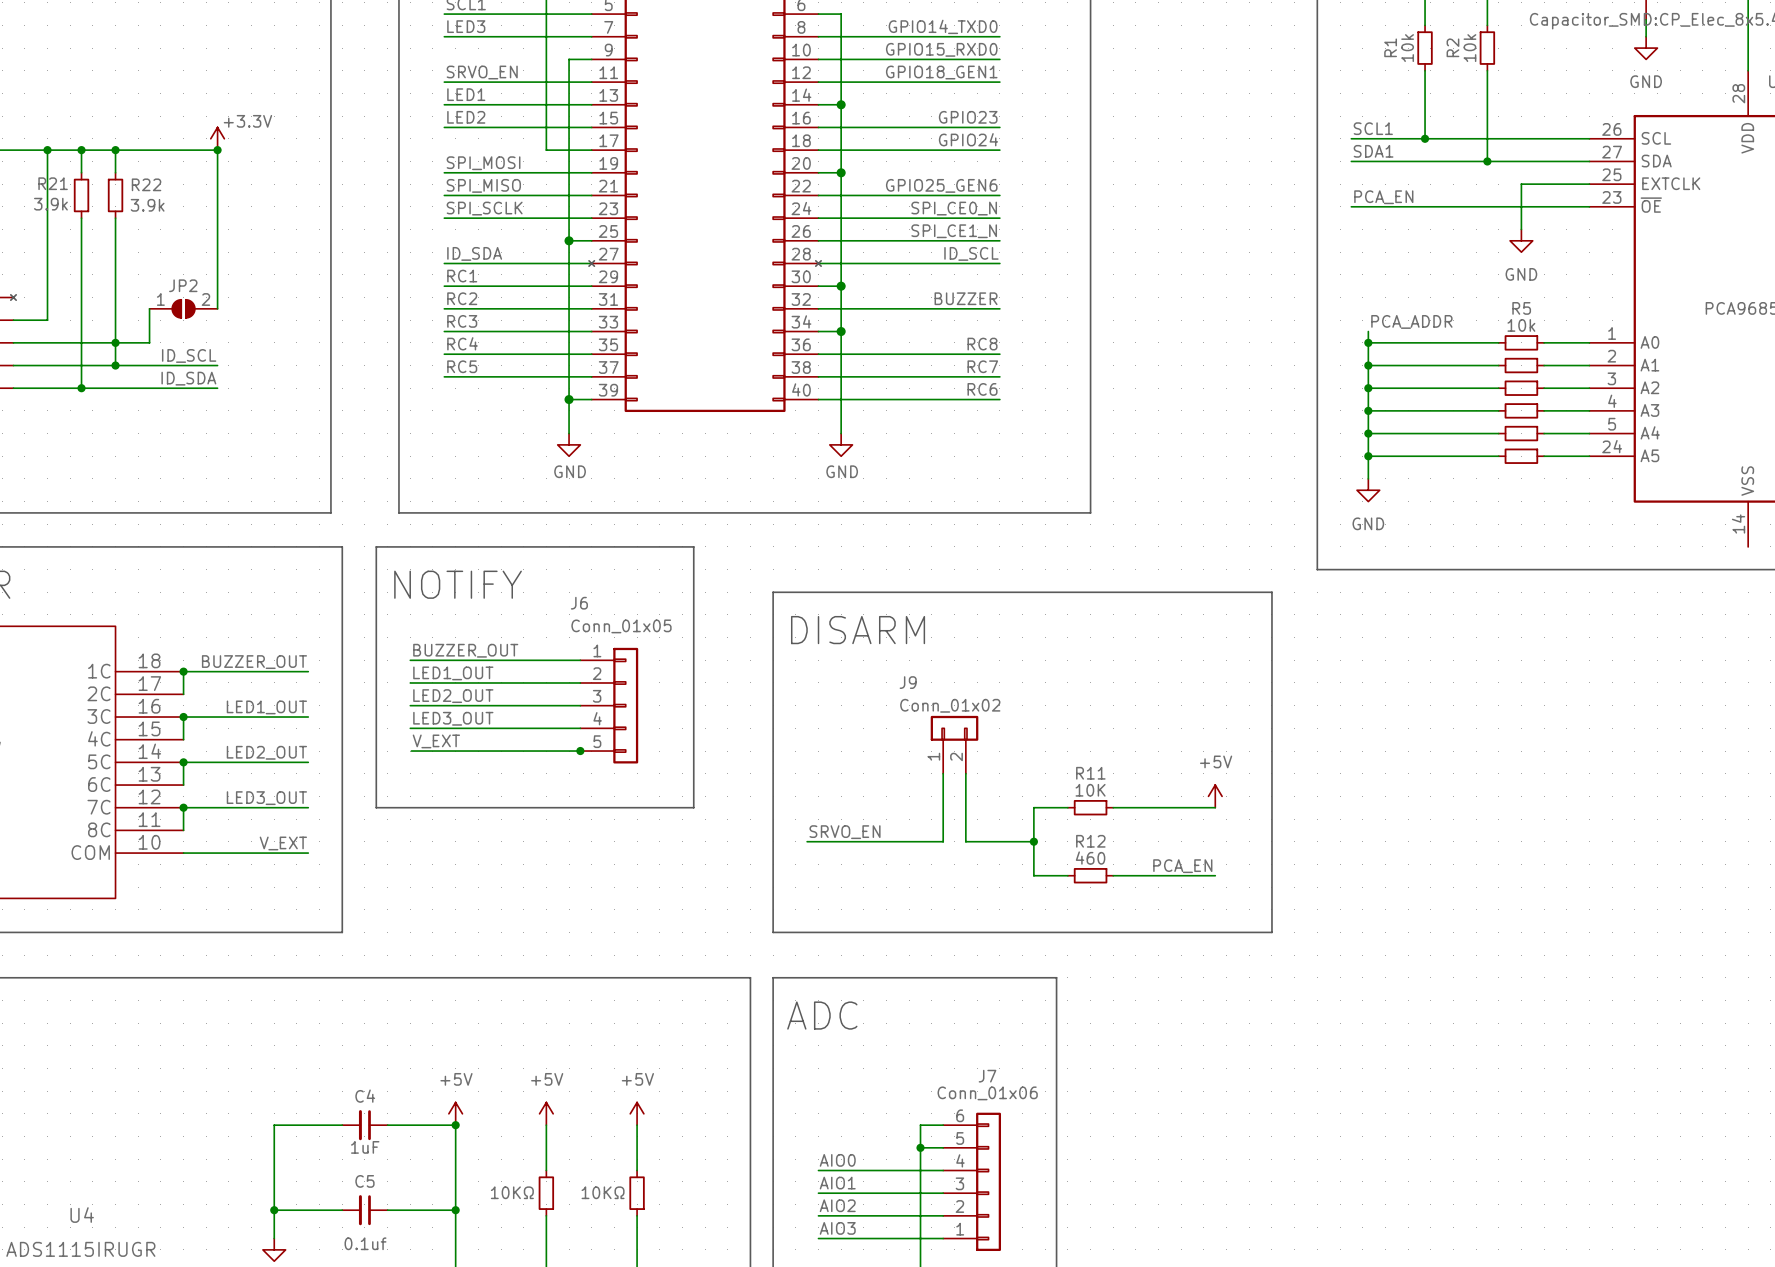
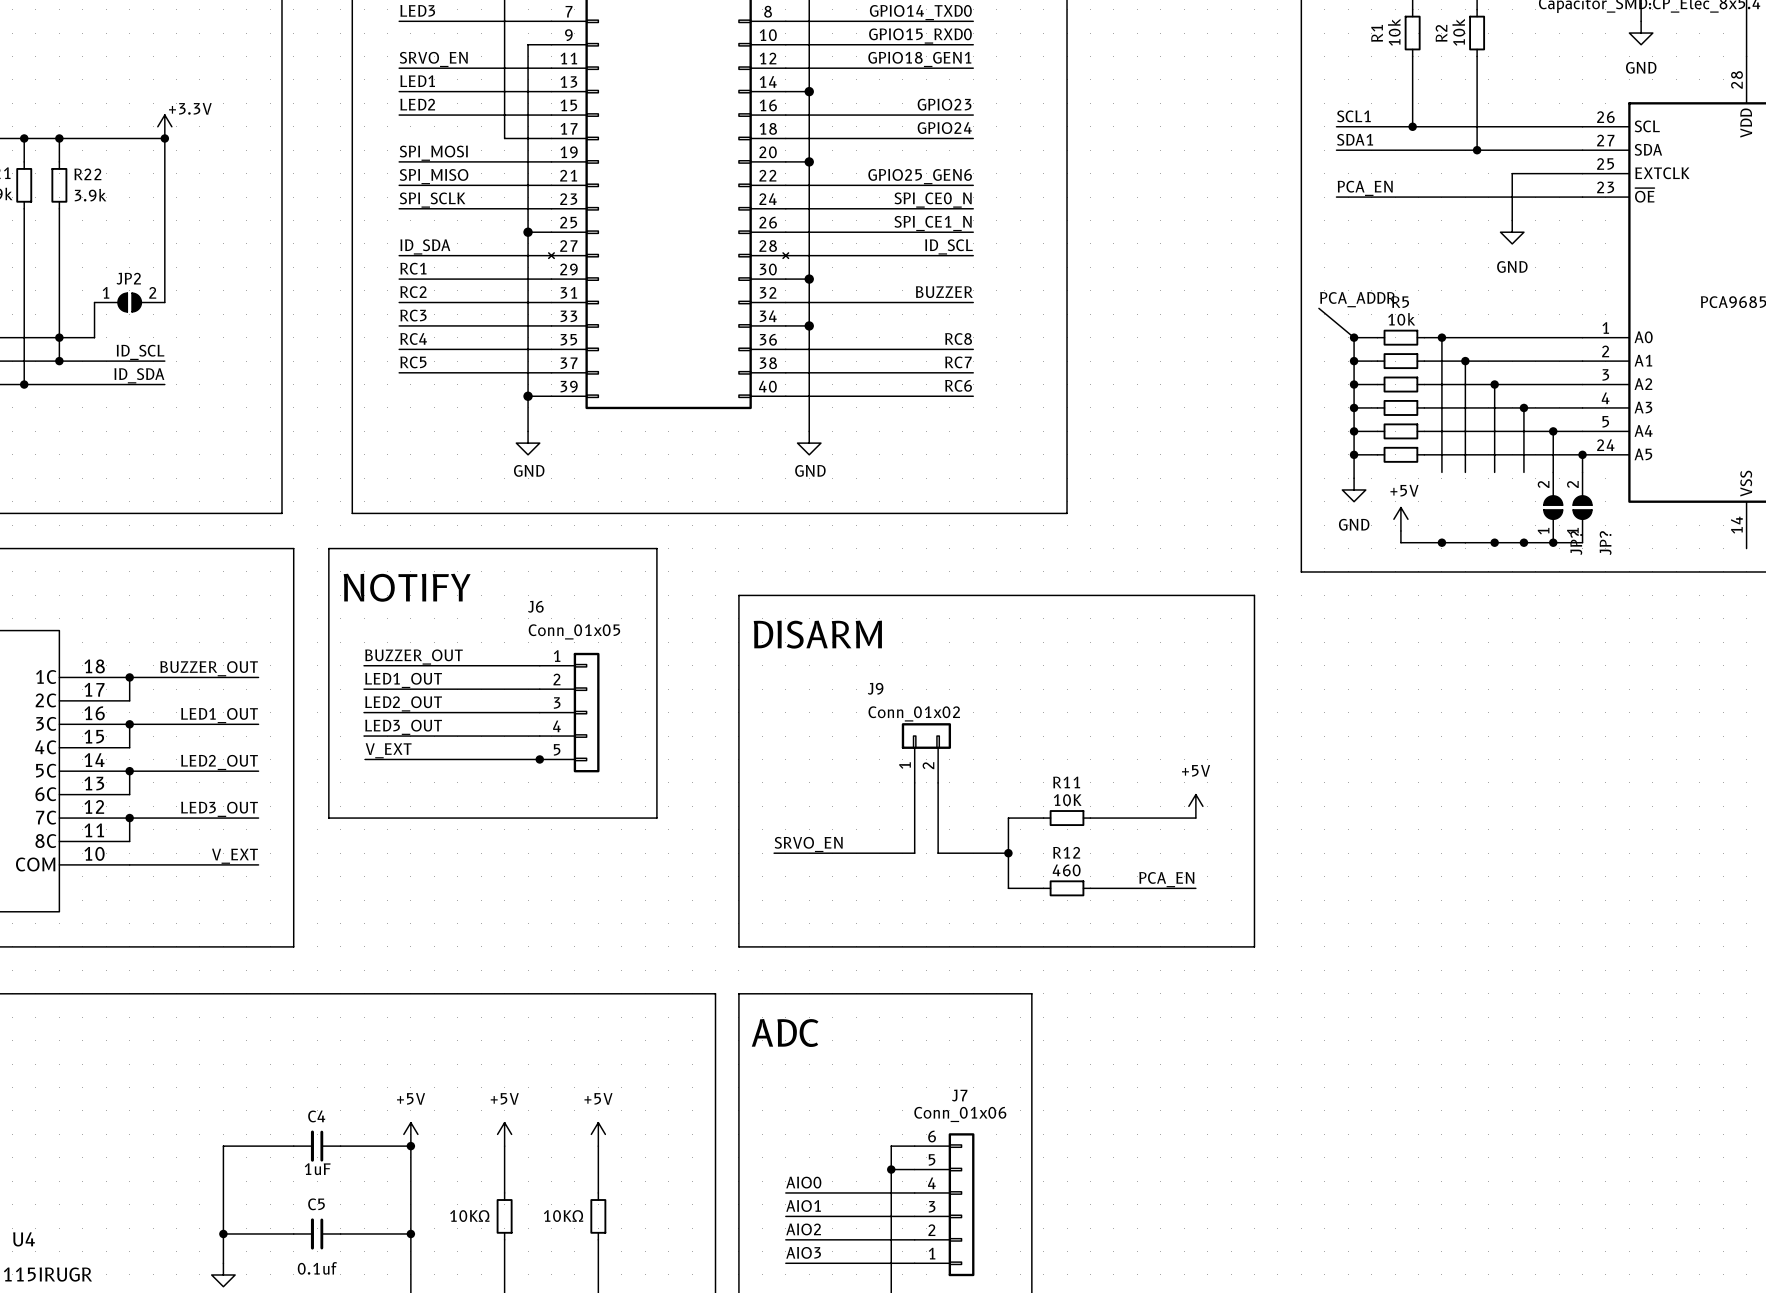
label position: PCA_ADDR (1411, 321) -> PCA_ADDR (1357, 299)
wire: (1368, 331) (1368, 342) -> (1318, 308) (1354, 337)
wire: (1391, 342) (1436, 342) -> (1488, 337) (1535, 337)
wire: none -> (1441, 337) (1441, 472)
junction: none -> (1441, 337)
R5 position: (1521, 342) -> (1400, 337)
wire: (1391, 365) (1436, 365) -> (1488, 361) (1535, 361)
part: none -> (1400, 361)
wire: none -> (1465, 361) (1465, 472)
junction: none -> (1465, 361)
part: (1521, 365) -> none
wire: (1391, 388) (1436, 388) -> (1488, 384) (1535, 384)
part: none -> (1400, 384)
wire: none -> (1494, 384) (1494, 472)
junction: none -> (1494, 384)
part: (1521, 388) -> none
wire: (1391, 410) (1436, 410) -> (1488, 407) (1535, 407)
part: none -> (1400, 407)
part: (1521, 410) -> none
wire: none -> (1523, 407) (1523, 472)
junction: none -> (1523, 407)
wire: (1391, 433) (1436, 433) -> (1488, 431) (1535, 431)
part: none -> (1400, 431)
part: (1521, 433) -> none
wire: none -> (1553, 431) (1553, 472)
junction: none -> (1553, 431)
wire: (1391, 456) (1436, 456) -> (1488, 454) (1535, 454)
part: none -> (1400, 454)
part: (1521, 456) -> none
wire: none -> (1582, 454) (1582, 472)
junction: none -> (1582, 454)
JP?: none -> (1553, 507)
JP?: none -> (1582, 507)
power symbol: none -> +5V (1400, 519)
wire: none -> (1400, 530) (1400, 542) (1582, 542)
junction: none -> (1441, 542)
junction: none -> (1494, 542)
junction: none -> (1523, 542)
junction: none -> (1553, 542)

